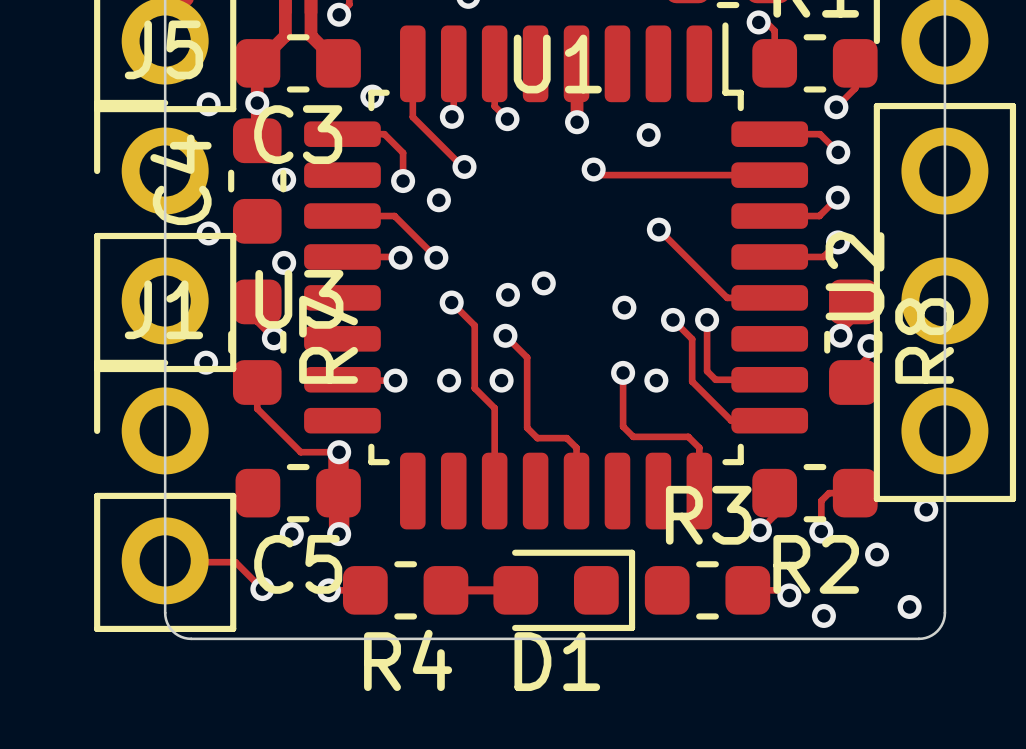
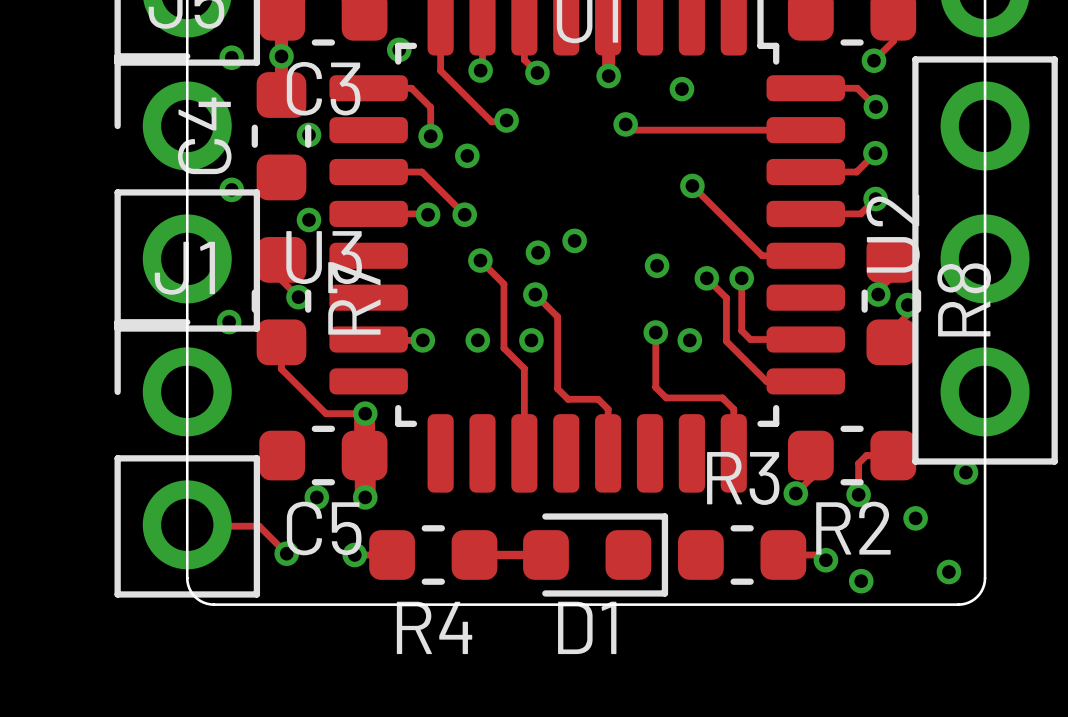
via position: (464, 166) -> (506, 120)

